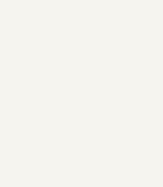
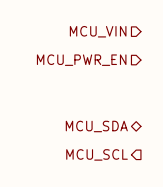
hierarchical label: none -> MCU_VIN (98, 31)
hierarchical label: none -> MCU_PWR_EN (81, 60)
hierarchical label: none -> MCU_SDA (96, 126)
hierarchical label: none -> MCU_SCL (97, 154)

